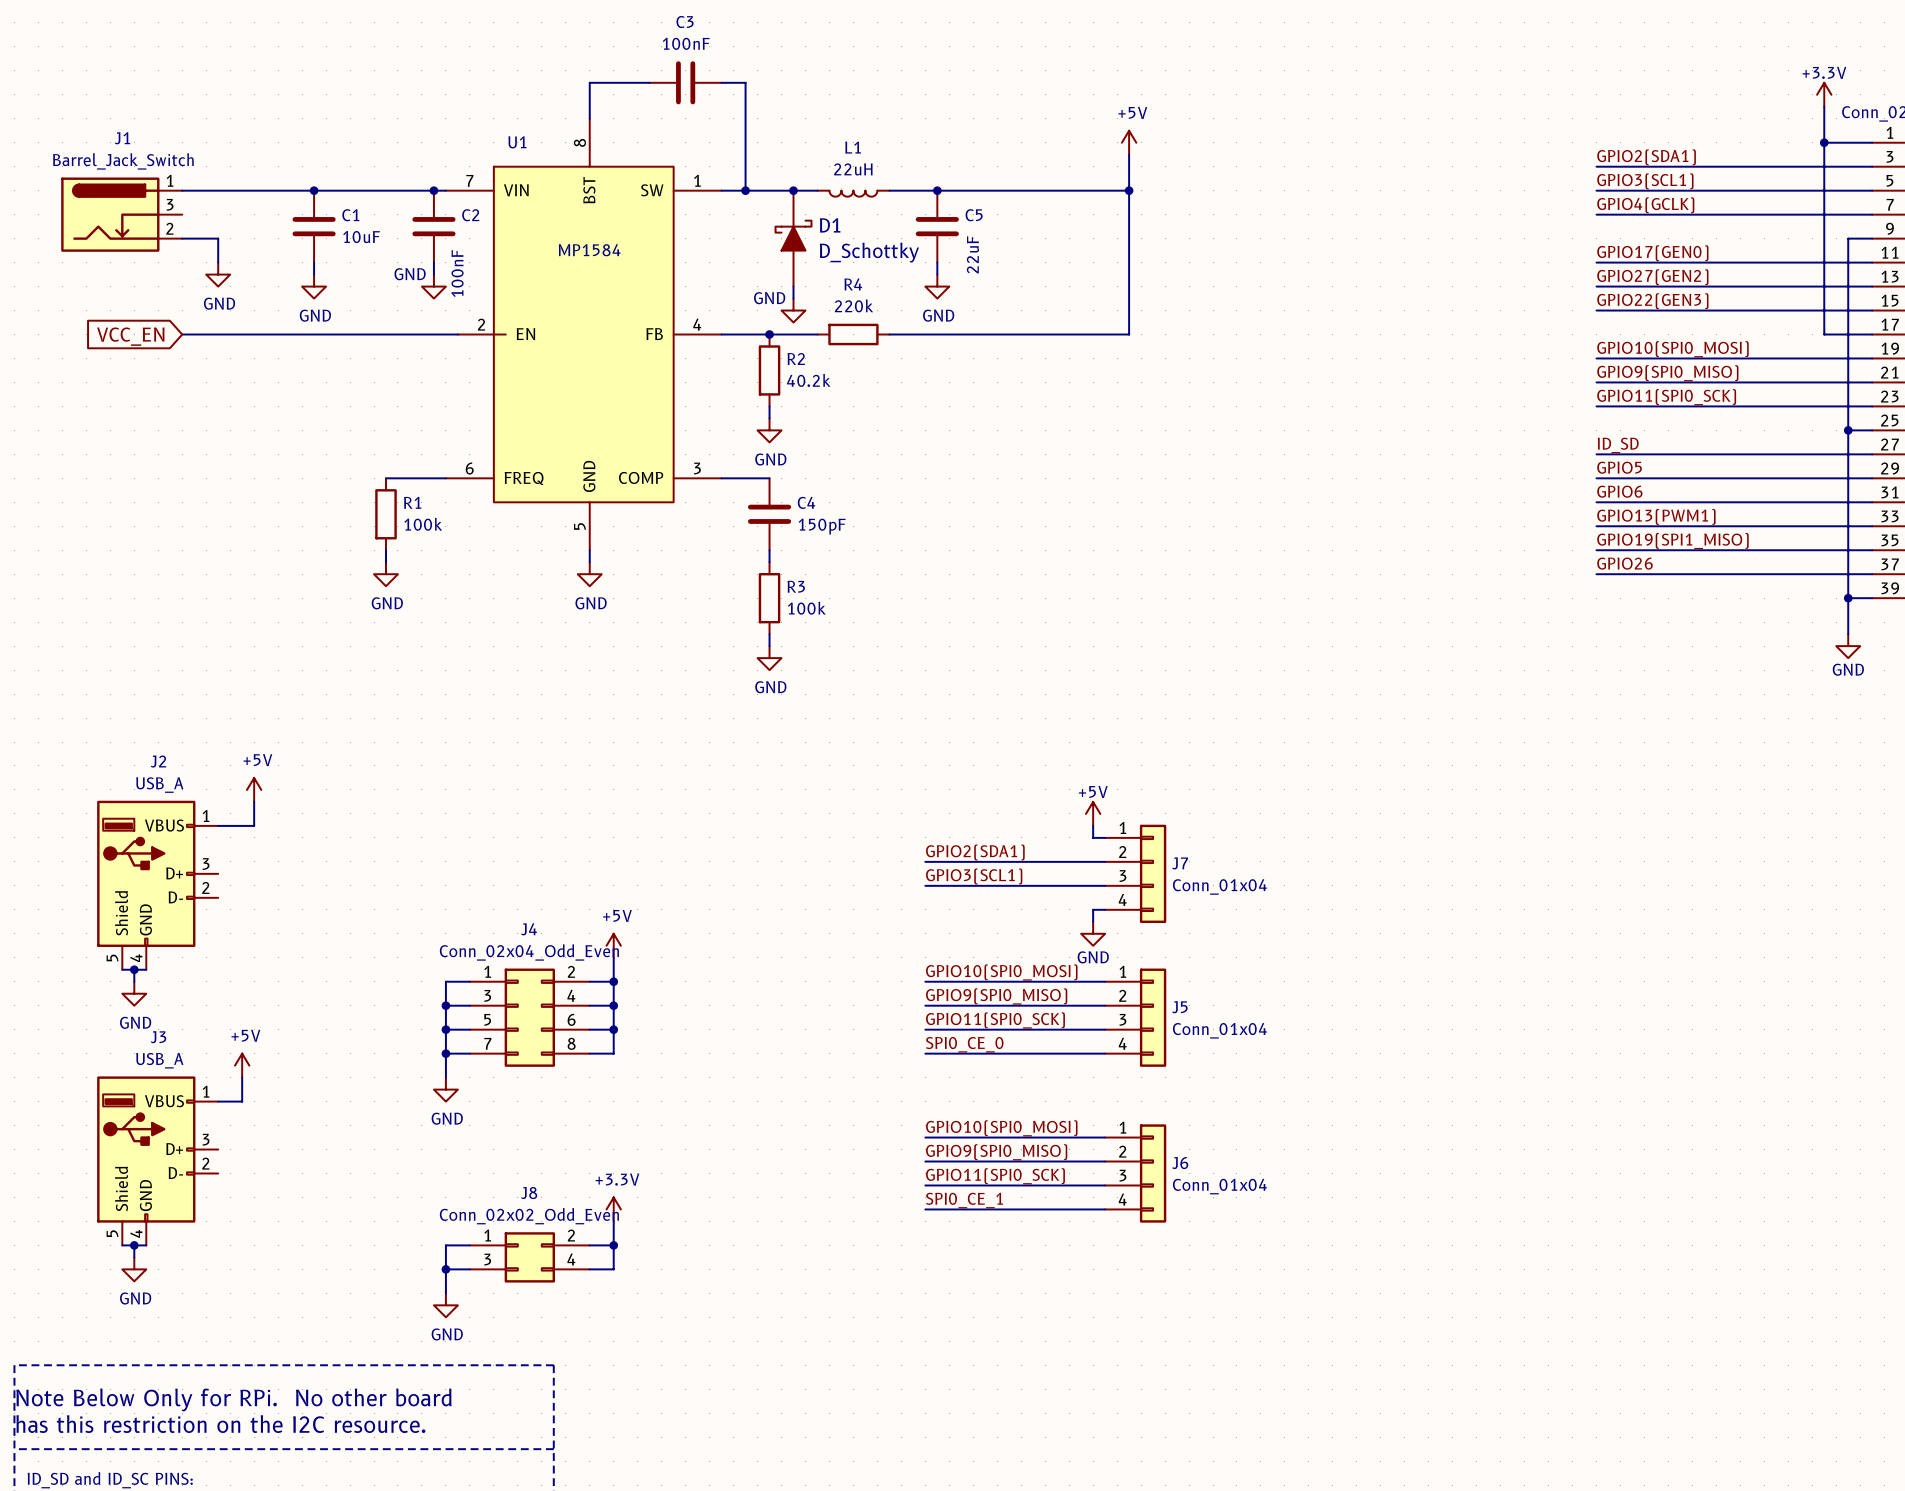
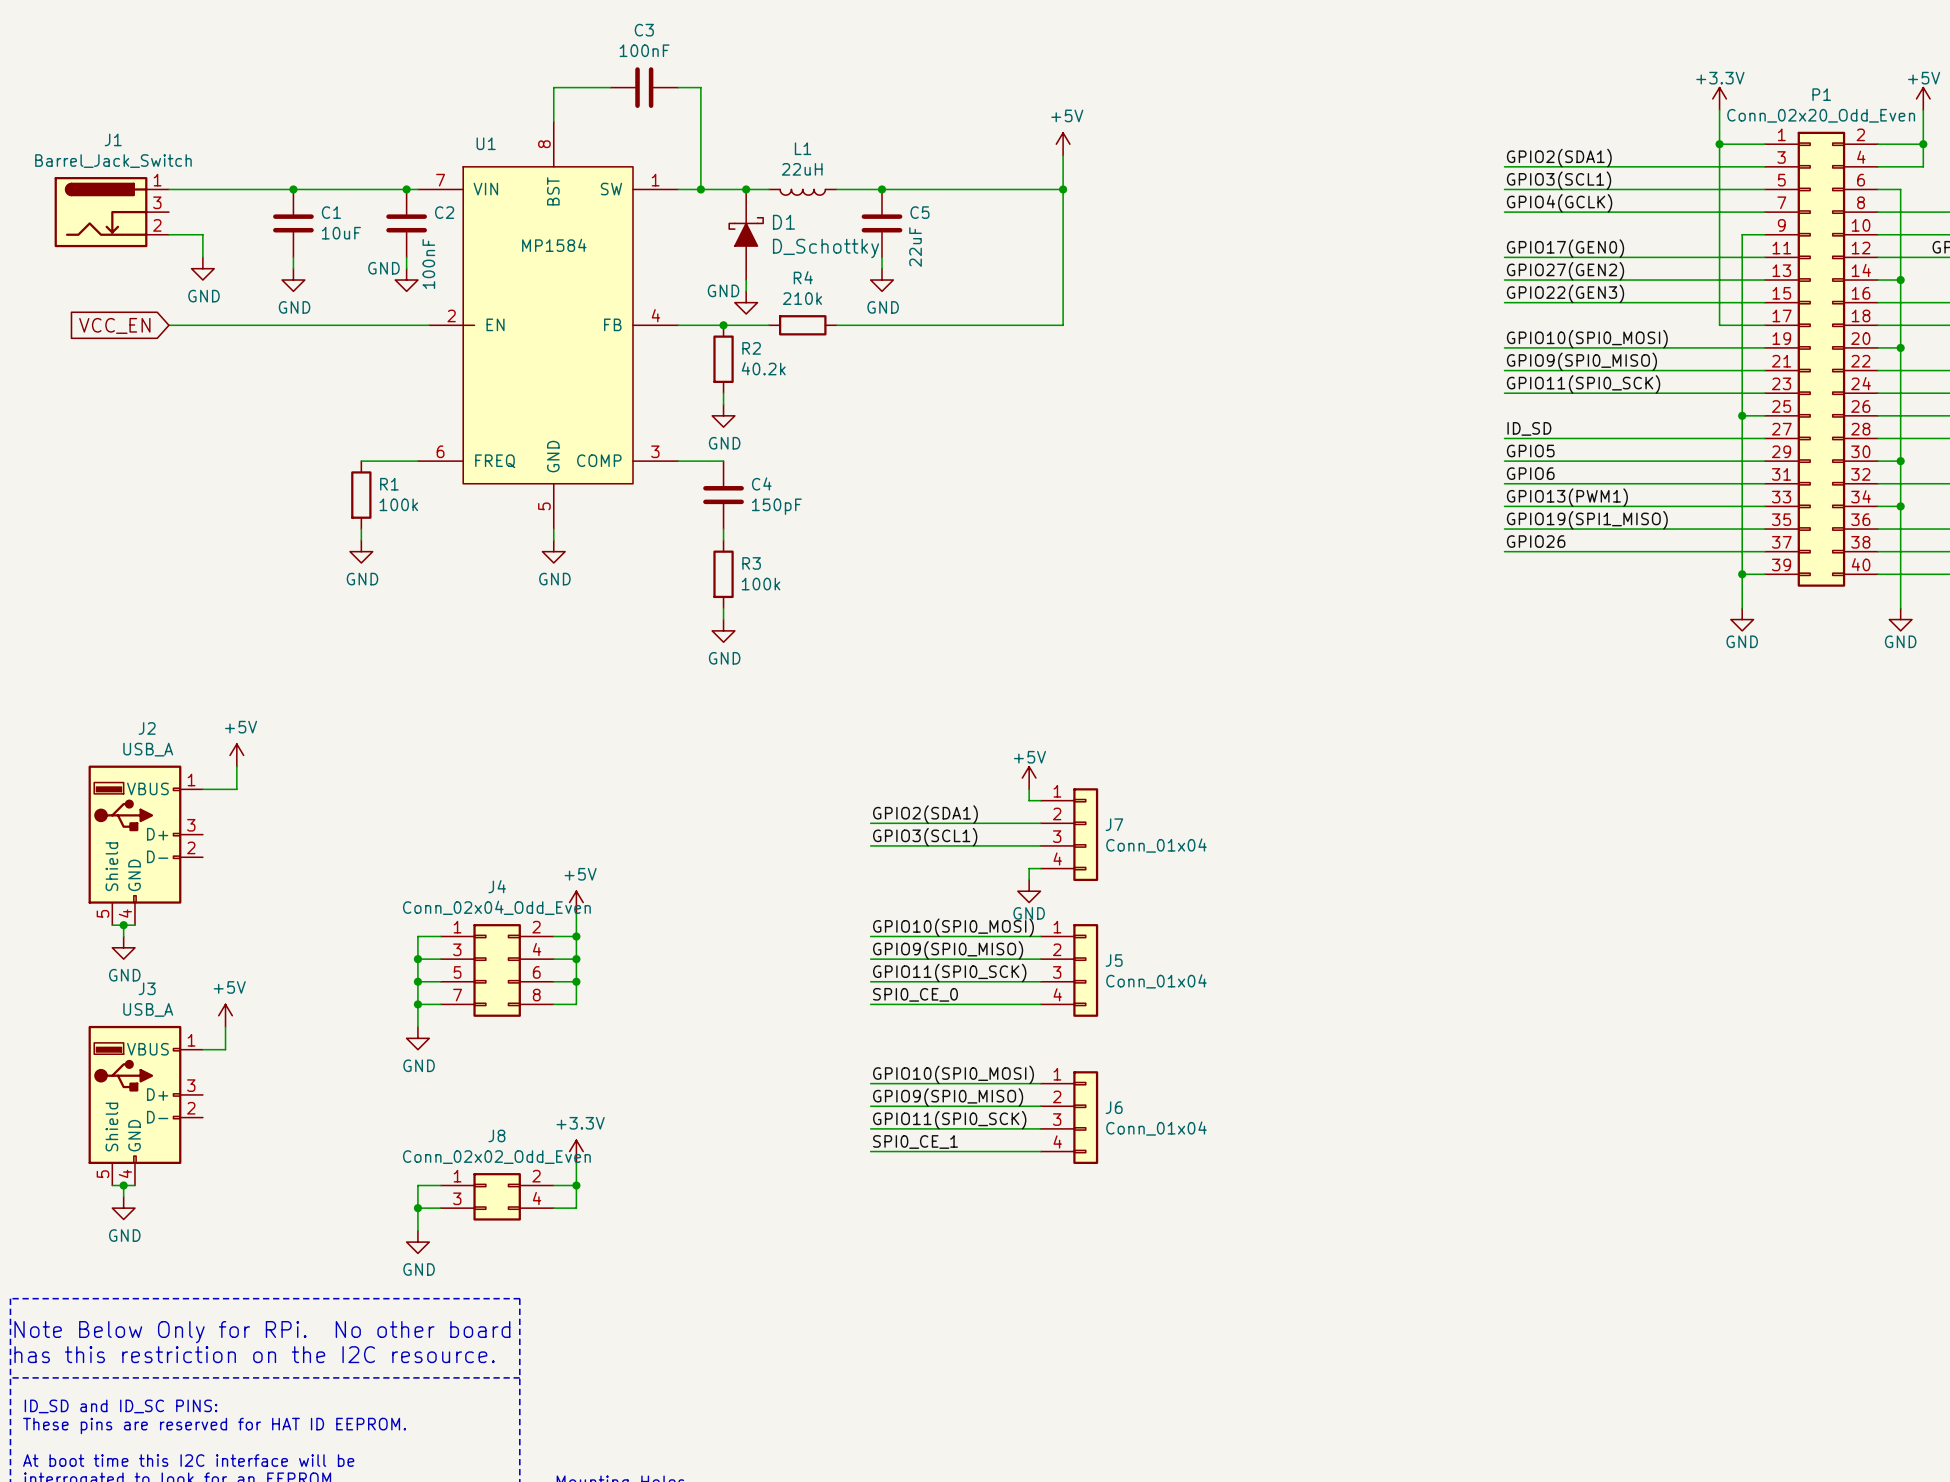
R4 value: 220k (854, 305) -> 210k (802, 298)

